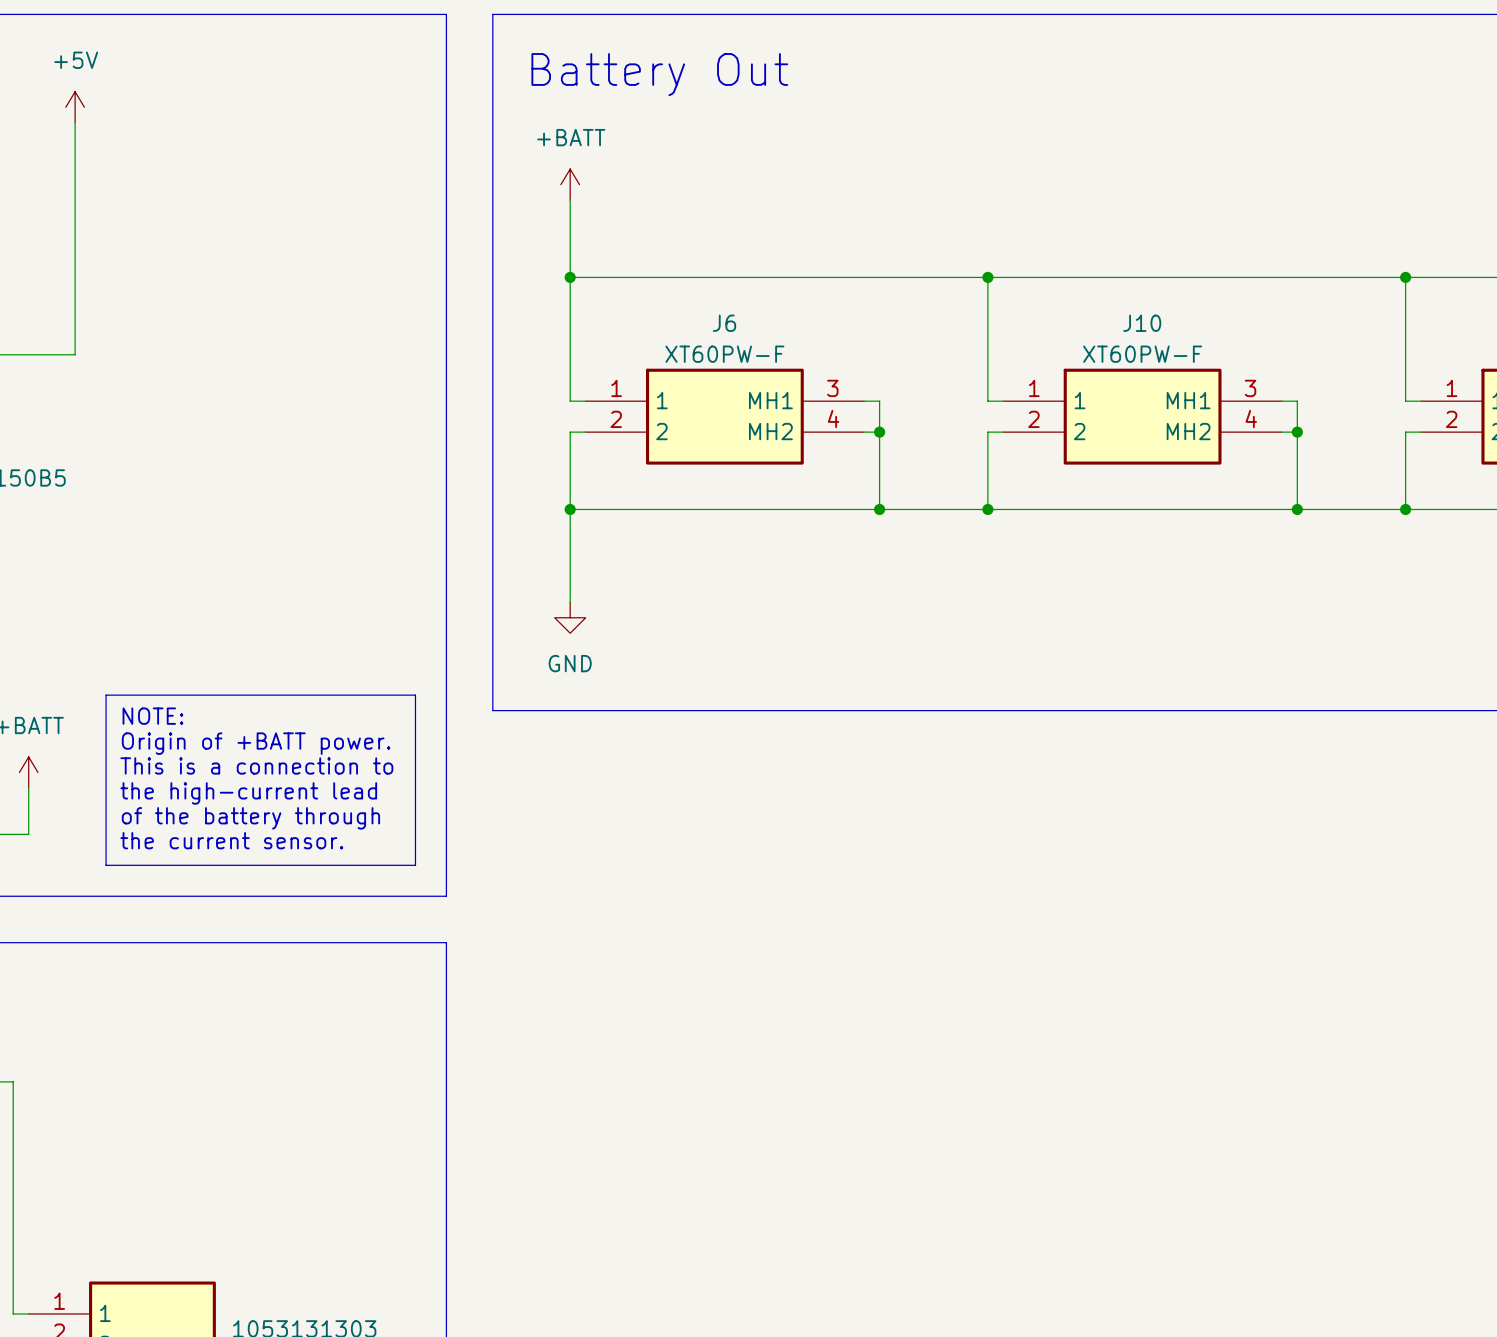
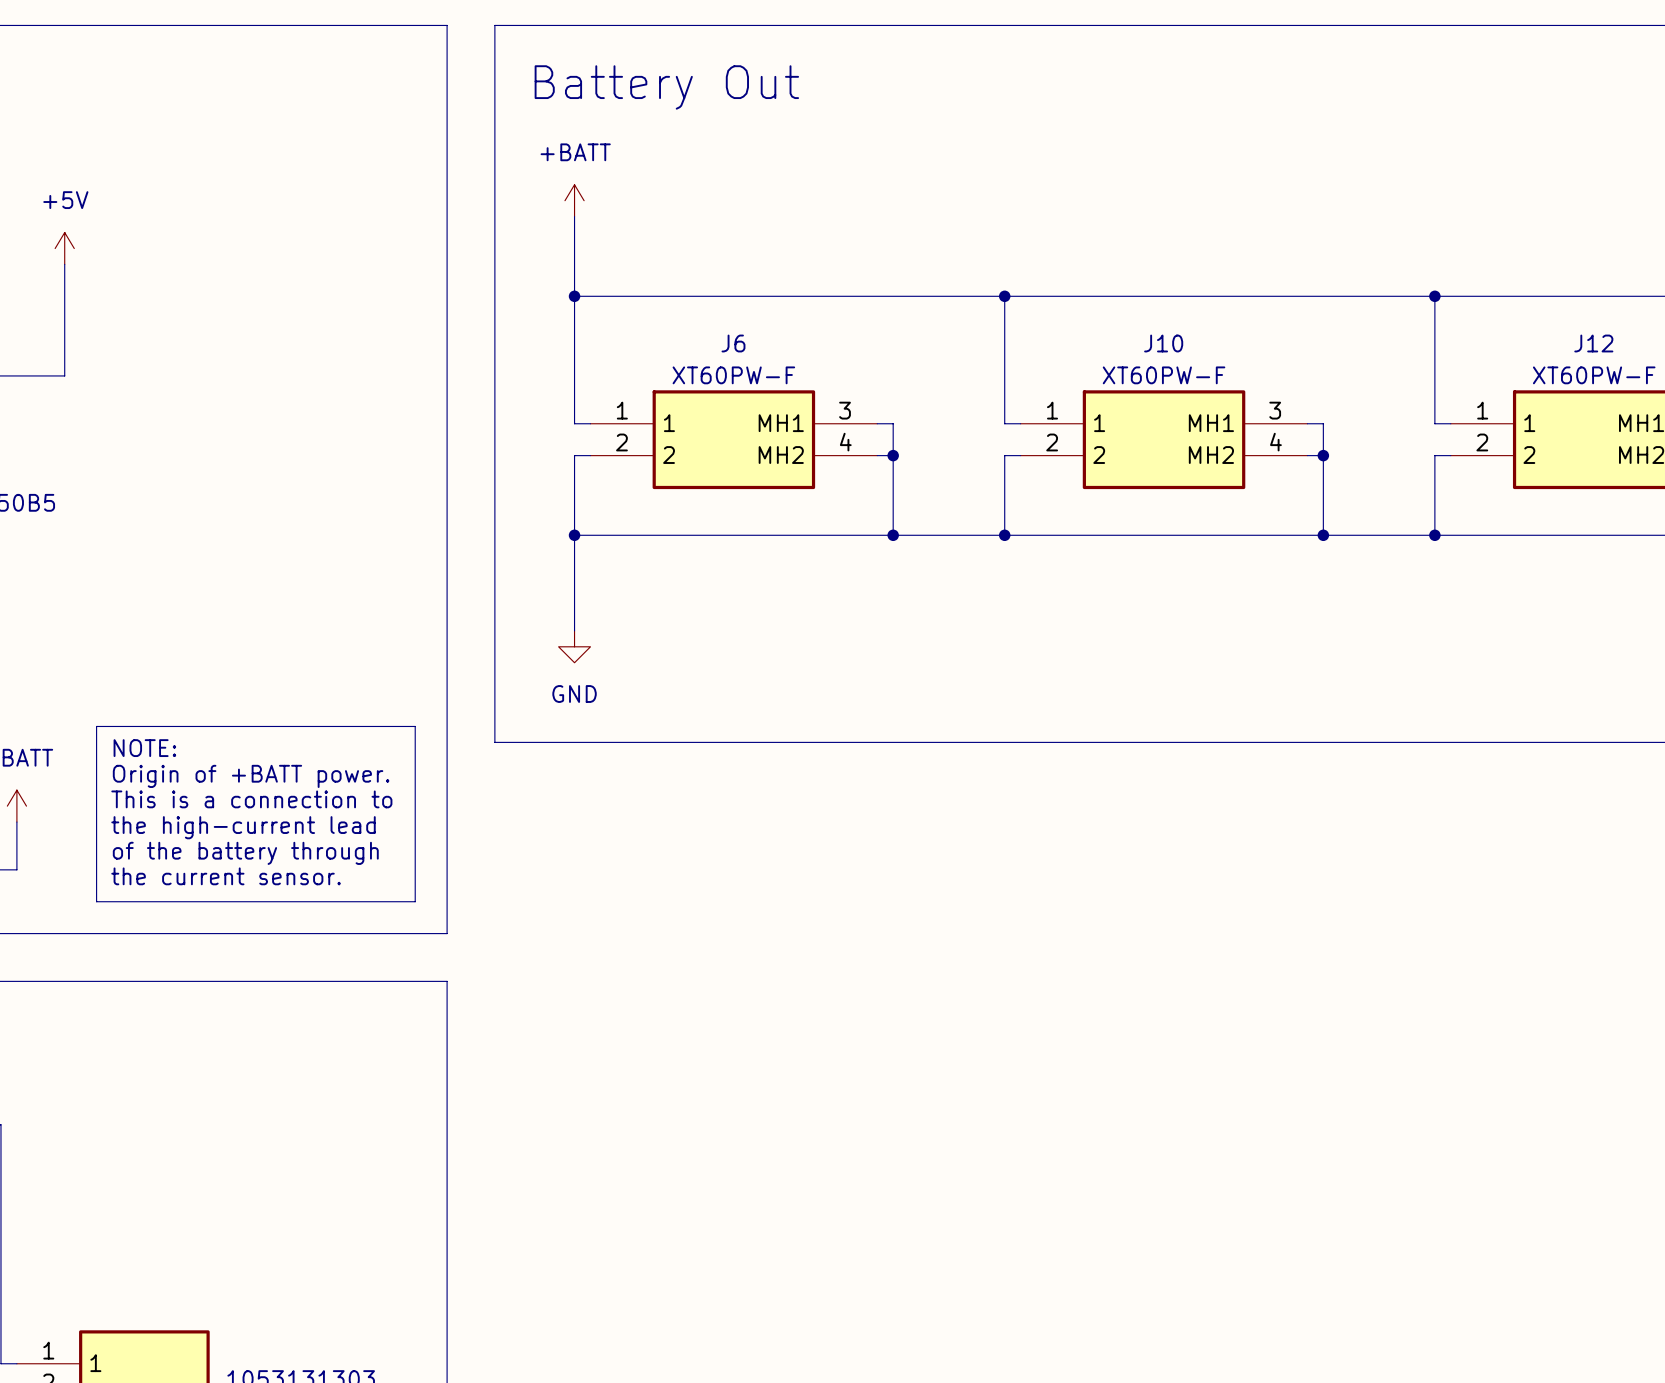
power symbol position: +5V (75, 107) -> +5V (64, 248)
wire: (75, 122) (75, 246) -> none

